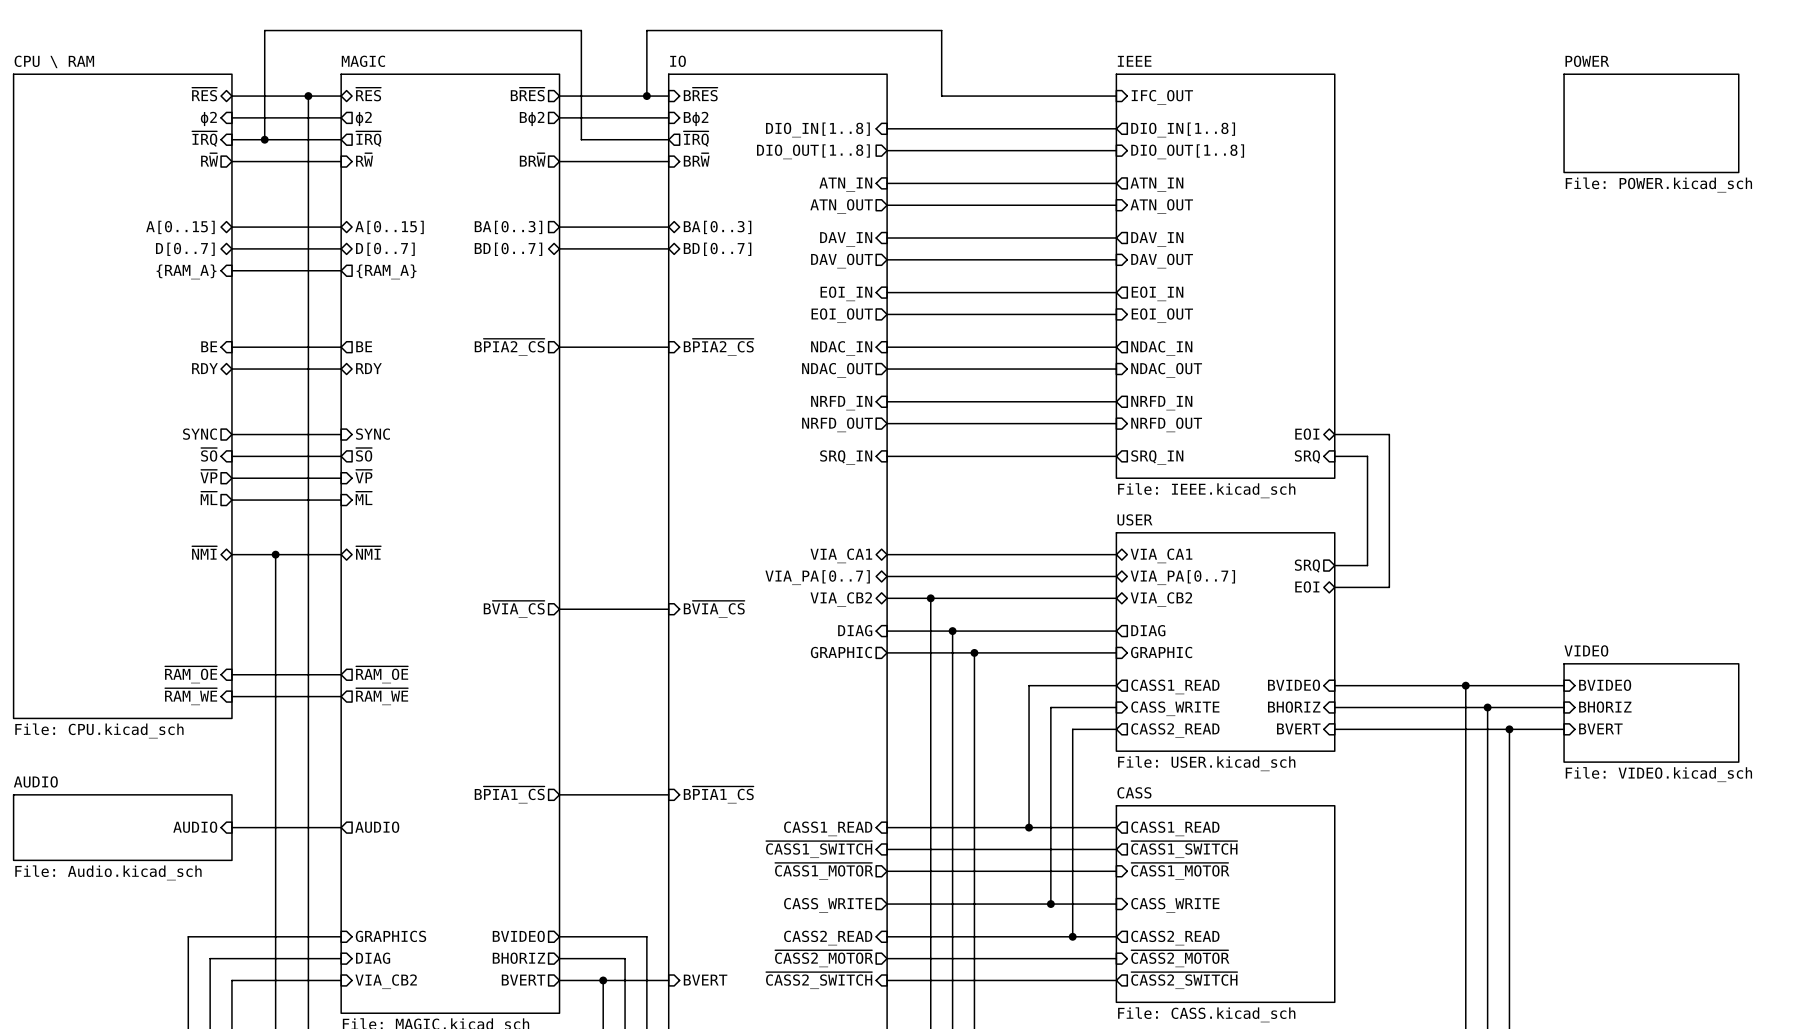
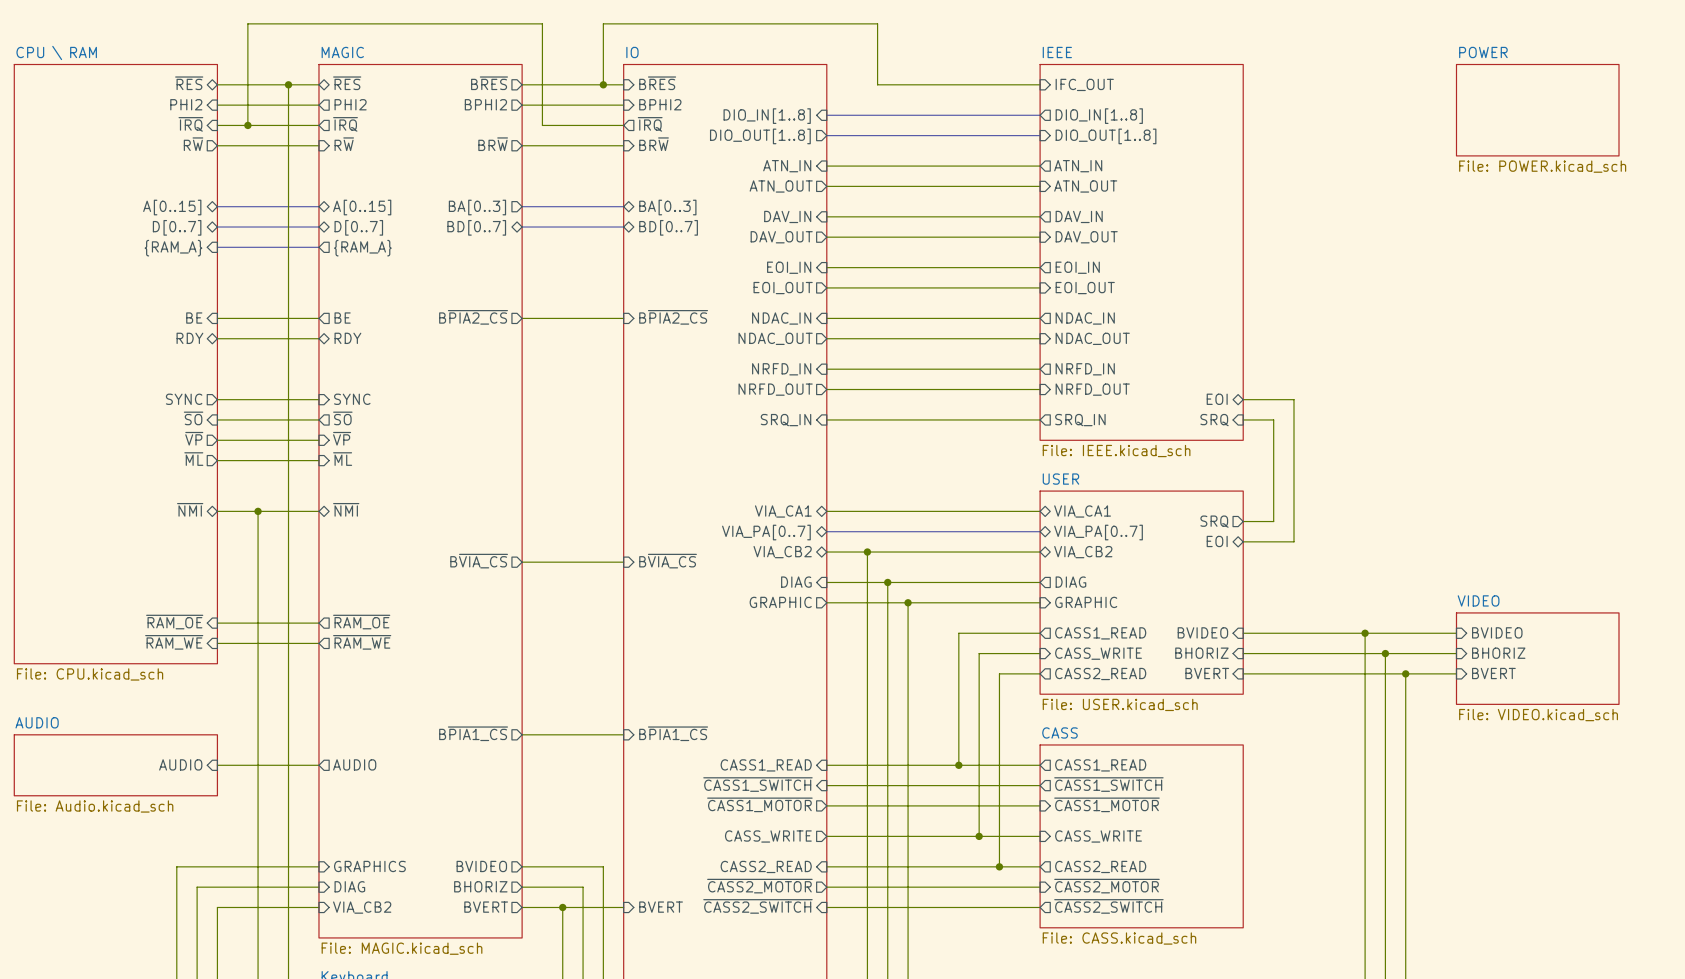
sheet pin: ϕ2 (208, 118) -> PHI2 (186, 104)
sheet pin: ϕ2 (363, 118) -> PHI2 (350, 104)
sheet pin: Bϕ2 (532, 118) -> BPHI2 (485, 104)
sheet pin: Bϕ2 (696, 118) -> BPHI2 (660, 104)

